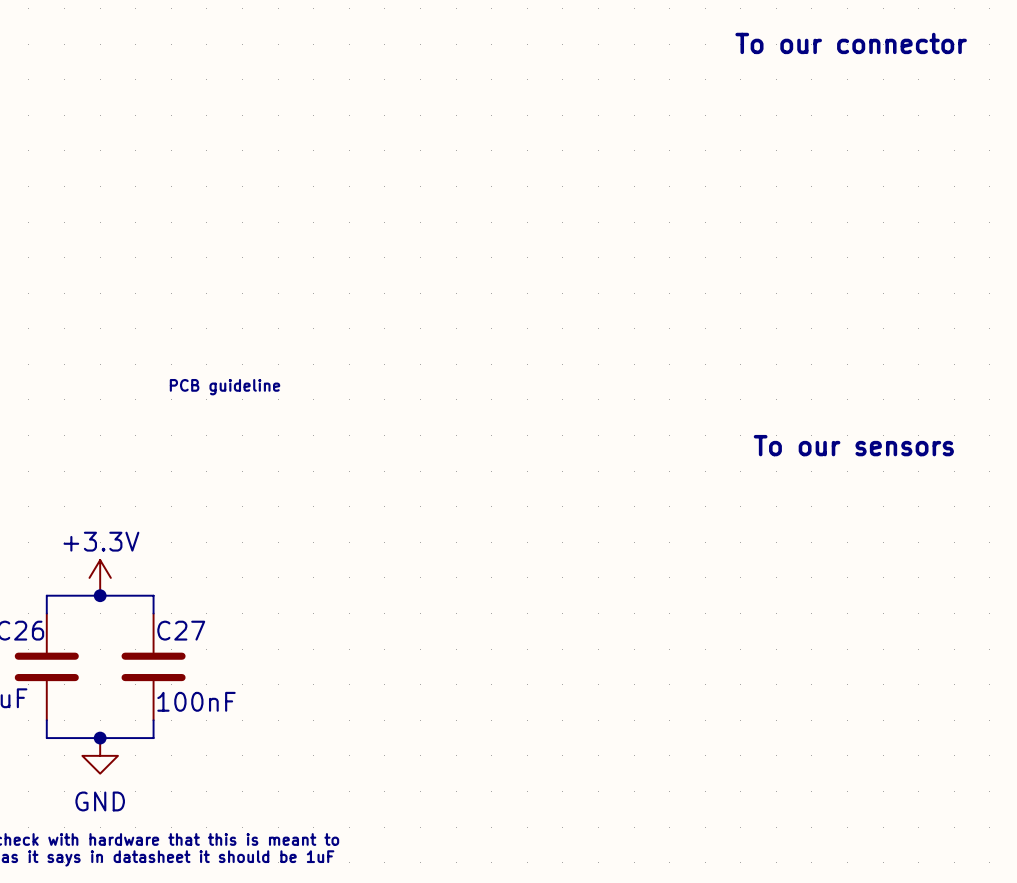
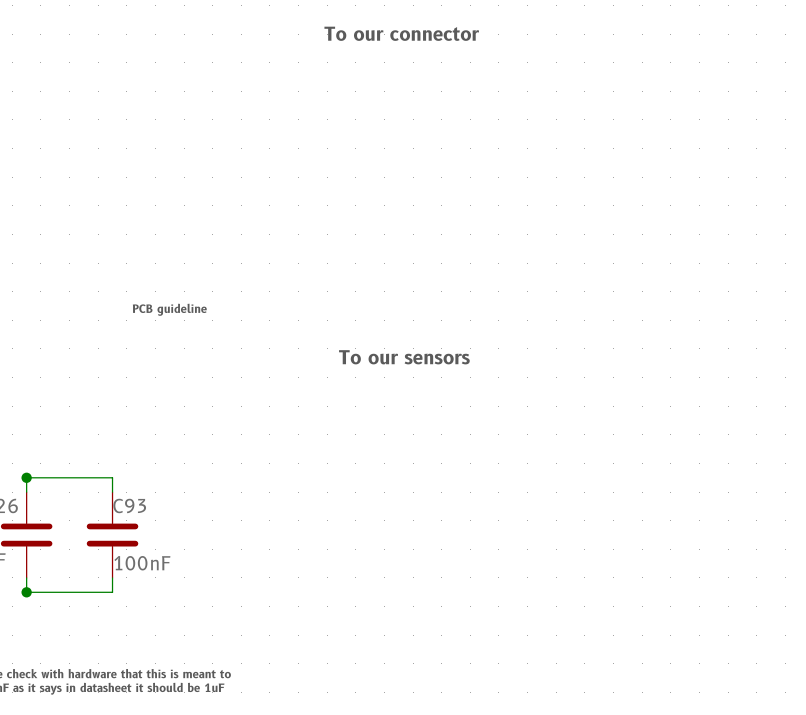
text position: To our connector (851, 43) -> To our connector (401, 33)
text position: To our sensors (853, 445) -> To our sensors (404, 357)
power symbol: +3.3V (100, 577) -> none
junction position: (100, 595) -> (26, 477)
C27 name: C27 (181, 630) -> C93 (129, 505)
junction position: (100, 738) -> (26, 592)
power symbol: GND (100, 755) -> none

